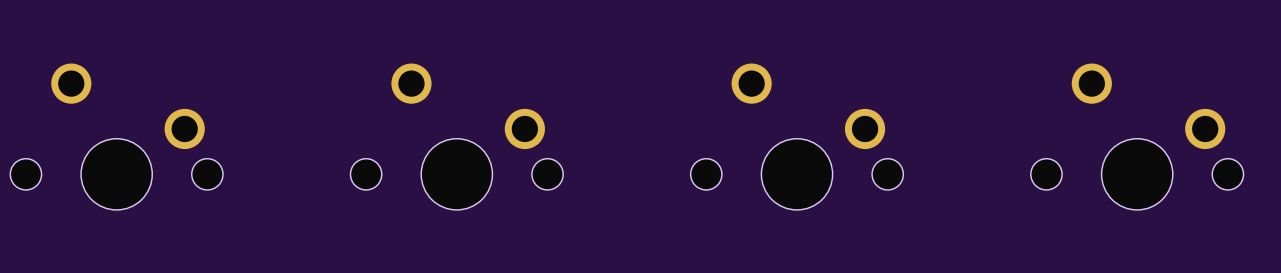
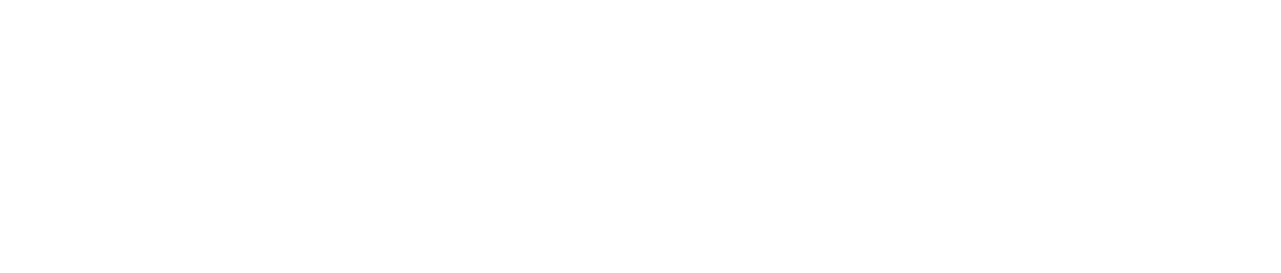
part: (116, 136) -> none
part: (456, 136) -> none
part: (797, 136) -> none
part: (1137, 136) -> none

